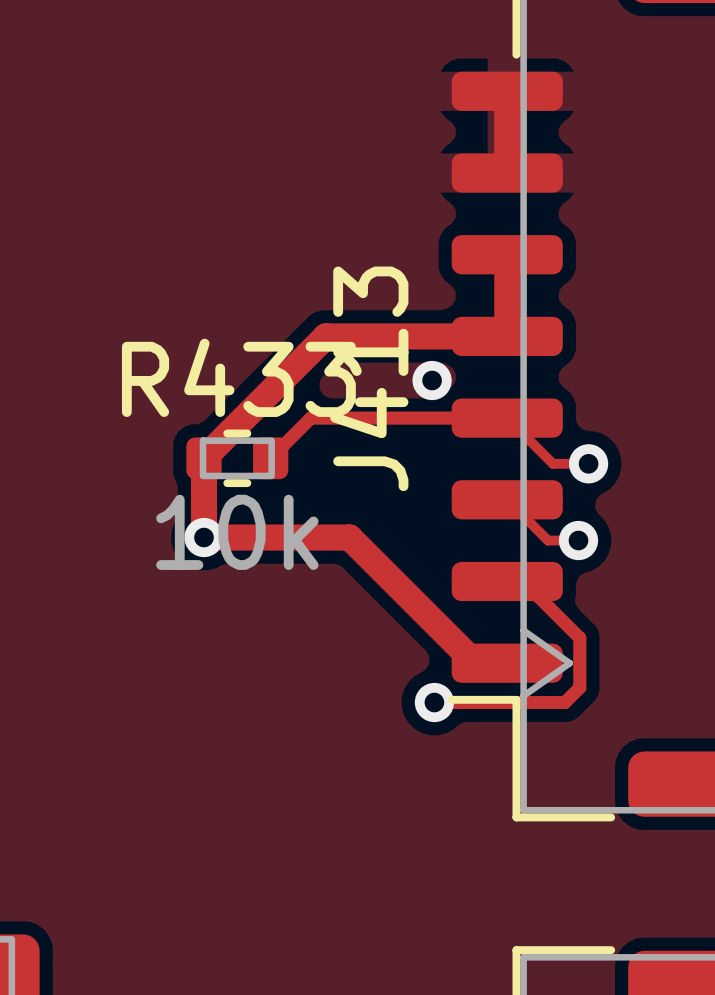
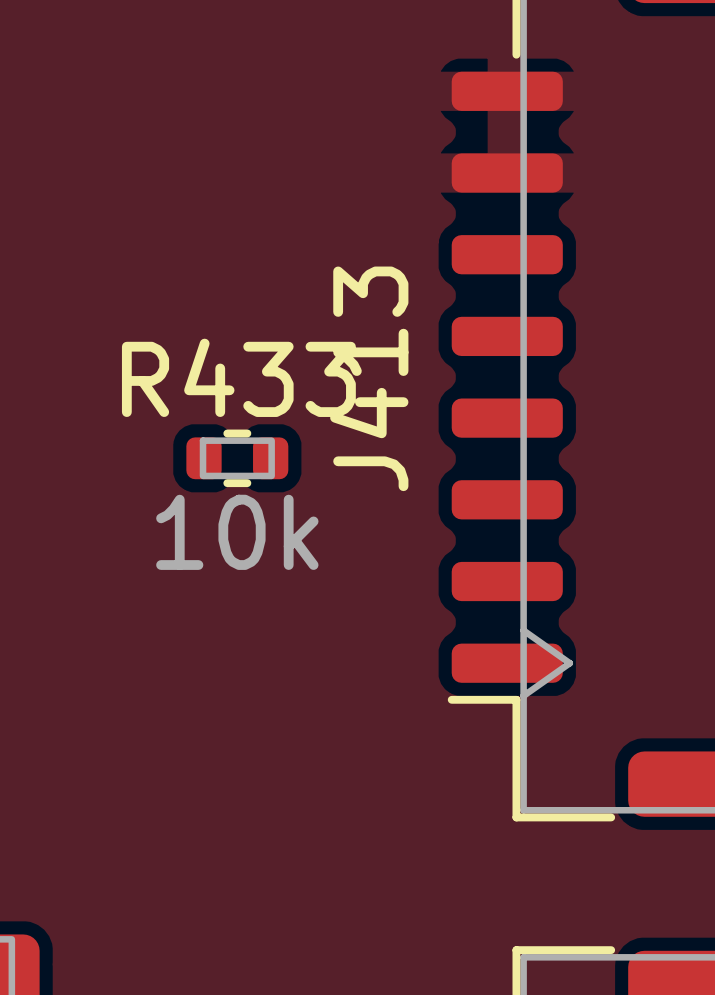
track: (507, 91) (507, 173) -> none
track: (507, 254) (507, 336) (325, 336) (204, 458) (204, 537) (349, 537) (475, 663) (507, 663) -> none
via: (432, 380) -> none
track: (270, 458) (310, 418) (507, 418) (552, 463) (588, 463) -> none
via: (588, 463) -> none
track: (507, 499) (547, 540) (578, 540) -> none
via: (204, 537) -> none
via: (578, 540) -> none
track: (507, 581) (523, 581) (579, 638) (579, 687) (564, 702) (434, 702) -> none
via: (434, 702) -> none

